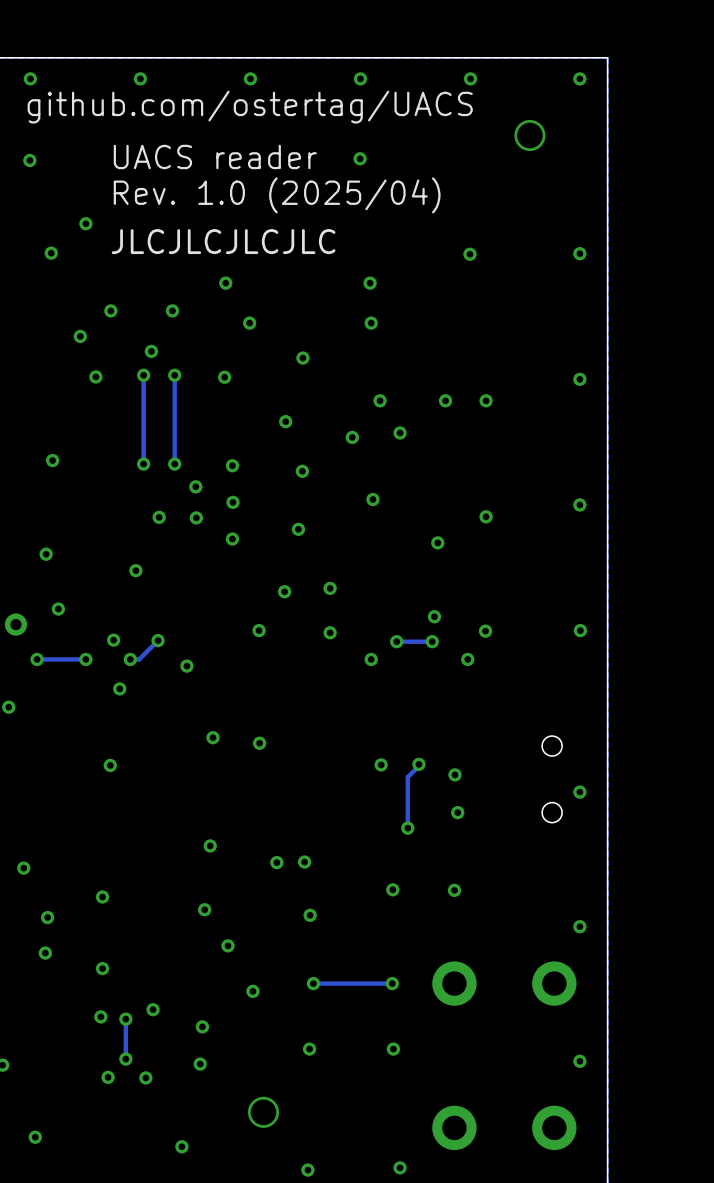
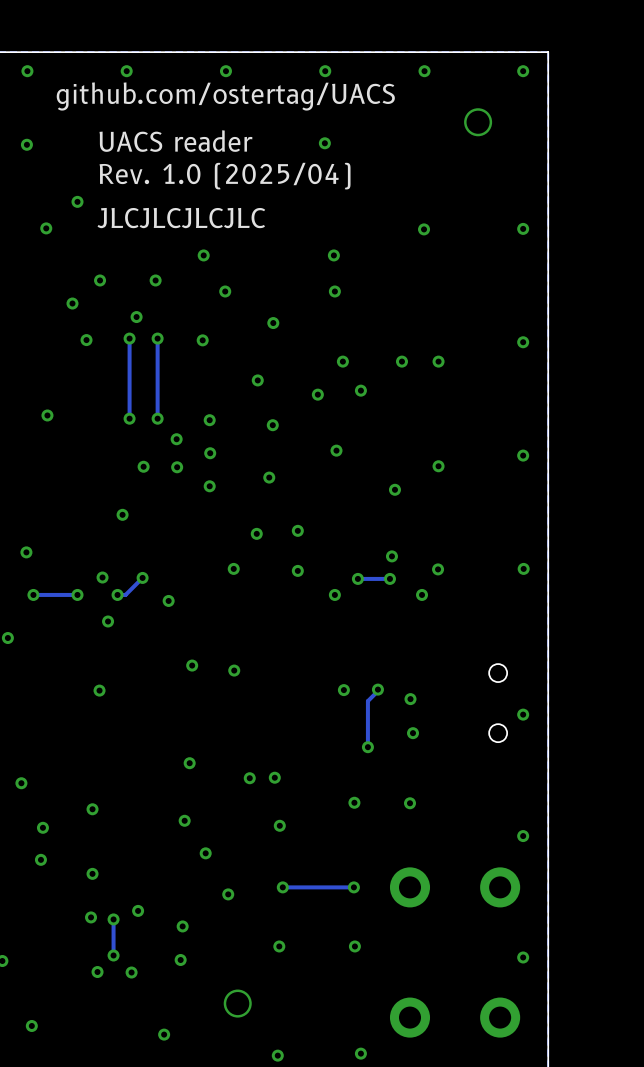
via: (46, 554) -> none
via: (58, 609) -> none
via: none -> (26, 552)
part: (15, 624) -> none

